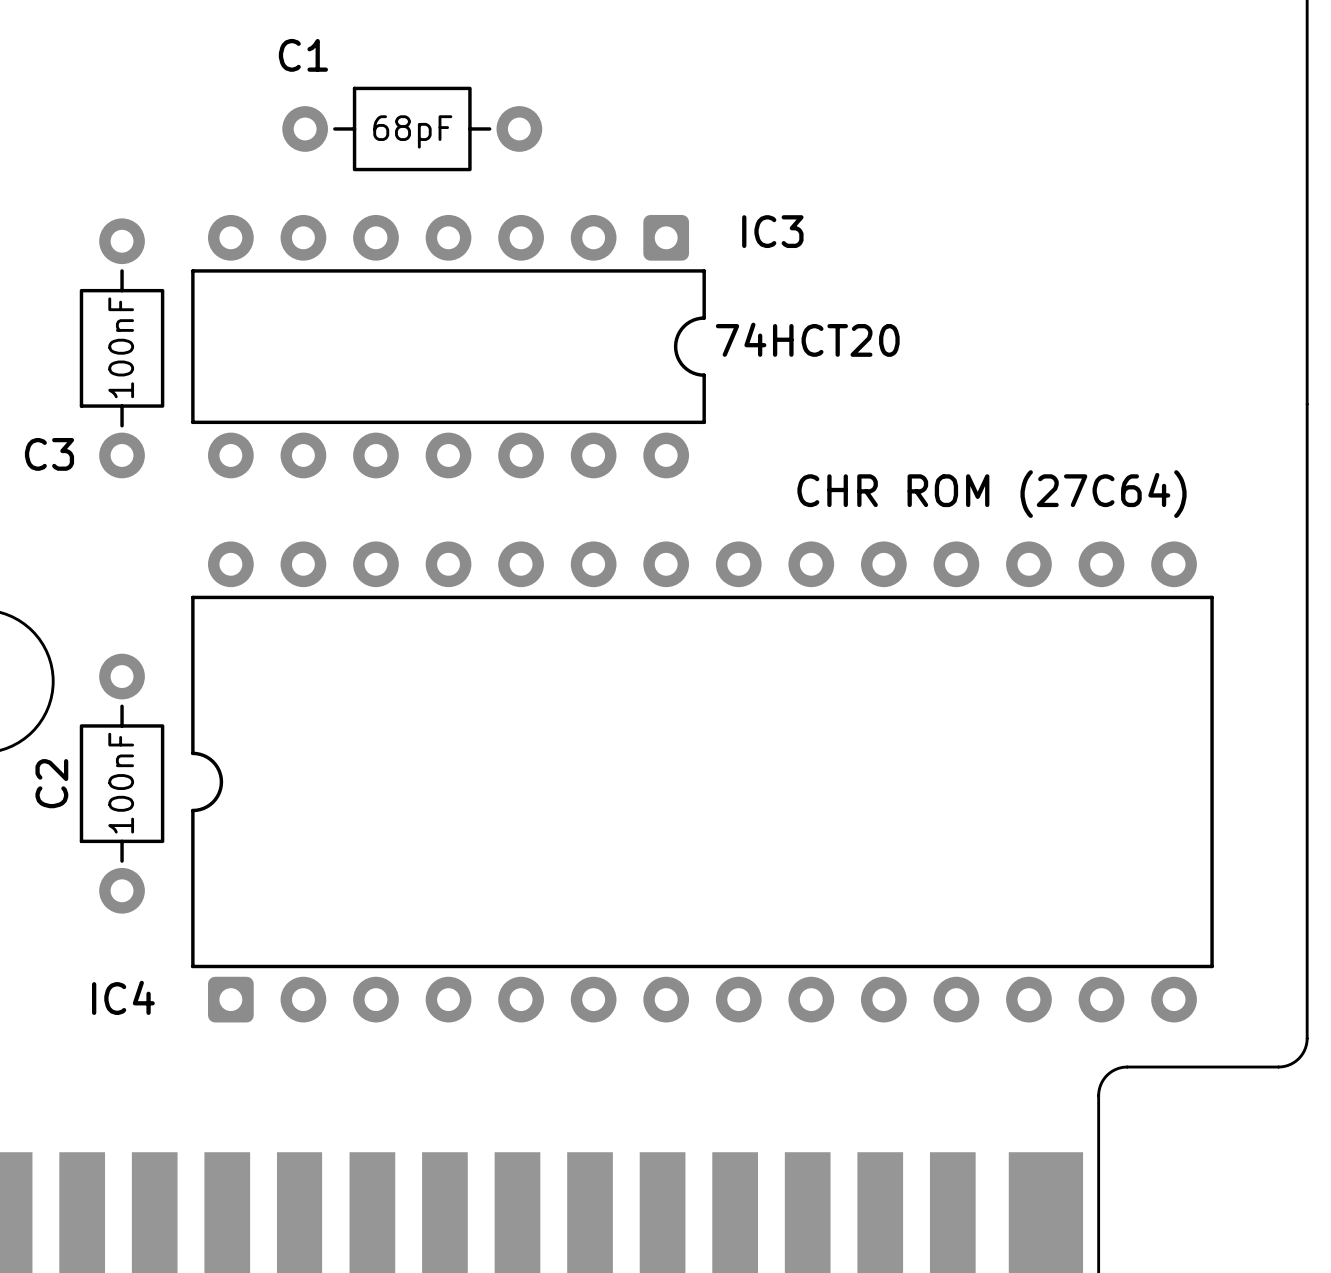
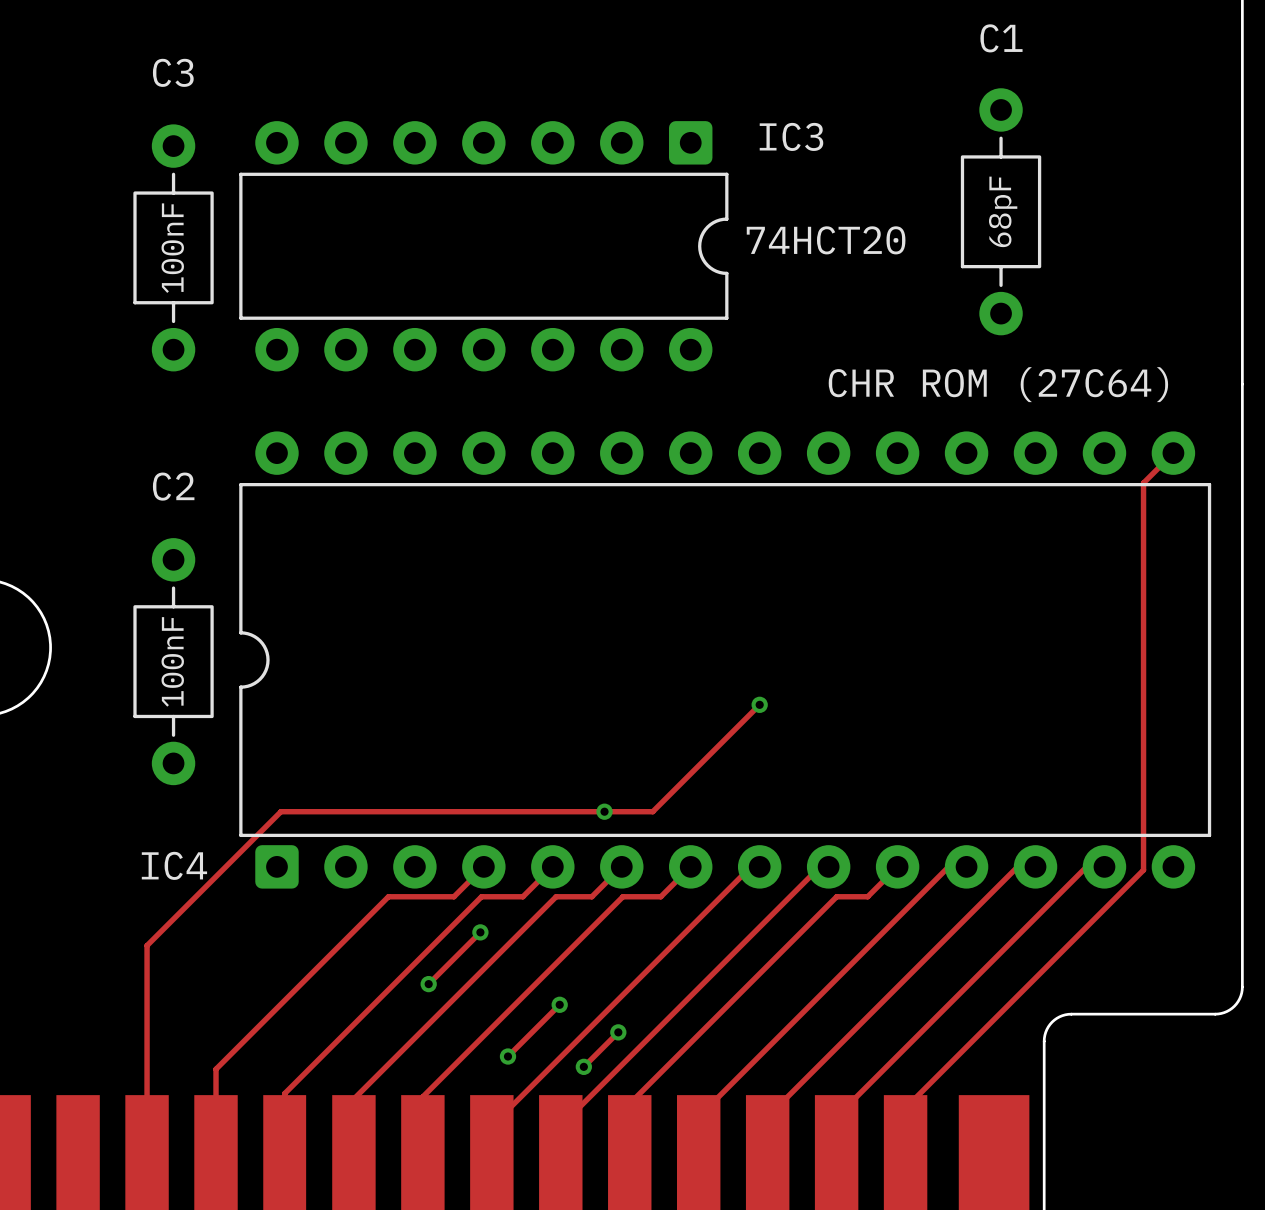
C1 name position: C1 (303, 55) -> C1 (1001, 38)
C1 rotation: 0° (412, 128) -> 90° clockwise (1001, 211)
C1 position: (412, 128) -> (1001, 211)
IC3 position: (448, 346) -> (483, 246)
C3 position: (122, 348) -> (173, 247)
C3 name position: C3 (49, 454) -> C3 (173, 72)
track: none -> (1173, 453) (1143, 483) (1143, 870) (905, 1108) (905, 1187)
track: none -> (759, 704) (652, 811) (280, 811) (147, 945) (147, 1187)
via: none -> (759, 704)
IC4 position: (702, 781) -> (725, 660)
C2 name rotation: 0° (51, 783) -> 90° clockwise (173, 486)
C2 name position: C2 (51, 783) -> C2 (173, 486)
C2 position: (122, 783) -> (173, 661)
via: none -> (604, 811)
track: none -> (483, 866) (453, 896) (388, 896) (216, 1069) (216, 1187)
track: none -> (552, 866) (522, 896) (481, 896) (284, 1093) (284, 1187)
track: none -> (621, 866) (591, 896) (556, 896) (353, 1098) (353, 1187)
track: none -> (690, 866) (660, 896) (622, 896) (422, 1096) (422, 1187)
track: none -> (759, 866) (750, 866) (491, 1126) (491, 1187)
track: none -> (828, 866) (819, 866) (560, 1126) (560, 1187)
track: none -> (897, 866) (867, 896) (836, 896) (629, 1103) (629, 1187)
track: none -> (966, 866) (948, 866) (698, 1116) (698, 1187)
track: none -> (1035, 866) (1017, 866) (767, 1116) (767, 1187)
track: none -> (1104, 866) (1086, 866) (836, 1116) (836, 1187)
track: none -> (480, 932) (428, 984)
via: none -> (480, 932)
via: none -> (428, 984)
track: none -> (559, 1004) (507, 1056)
via: none -> (559, 1004)
track: none -> (618, 1032) (583, 1066)
via: none -> (618, 1032)
via: none -> (507, 1056)
via: none -> (583, 1066)

